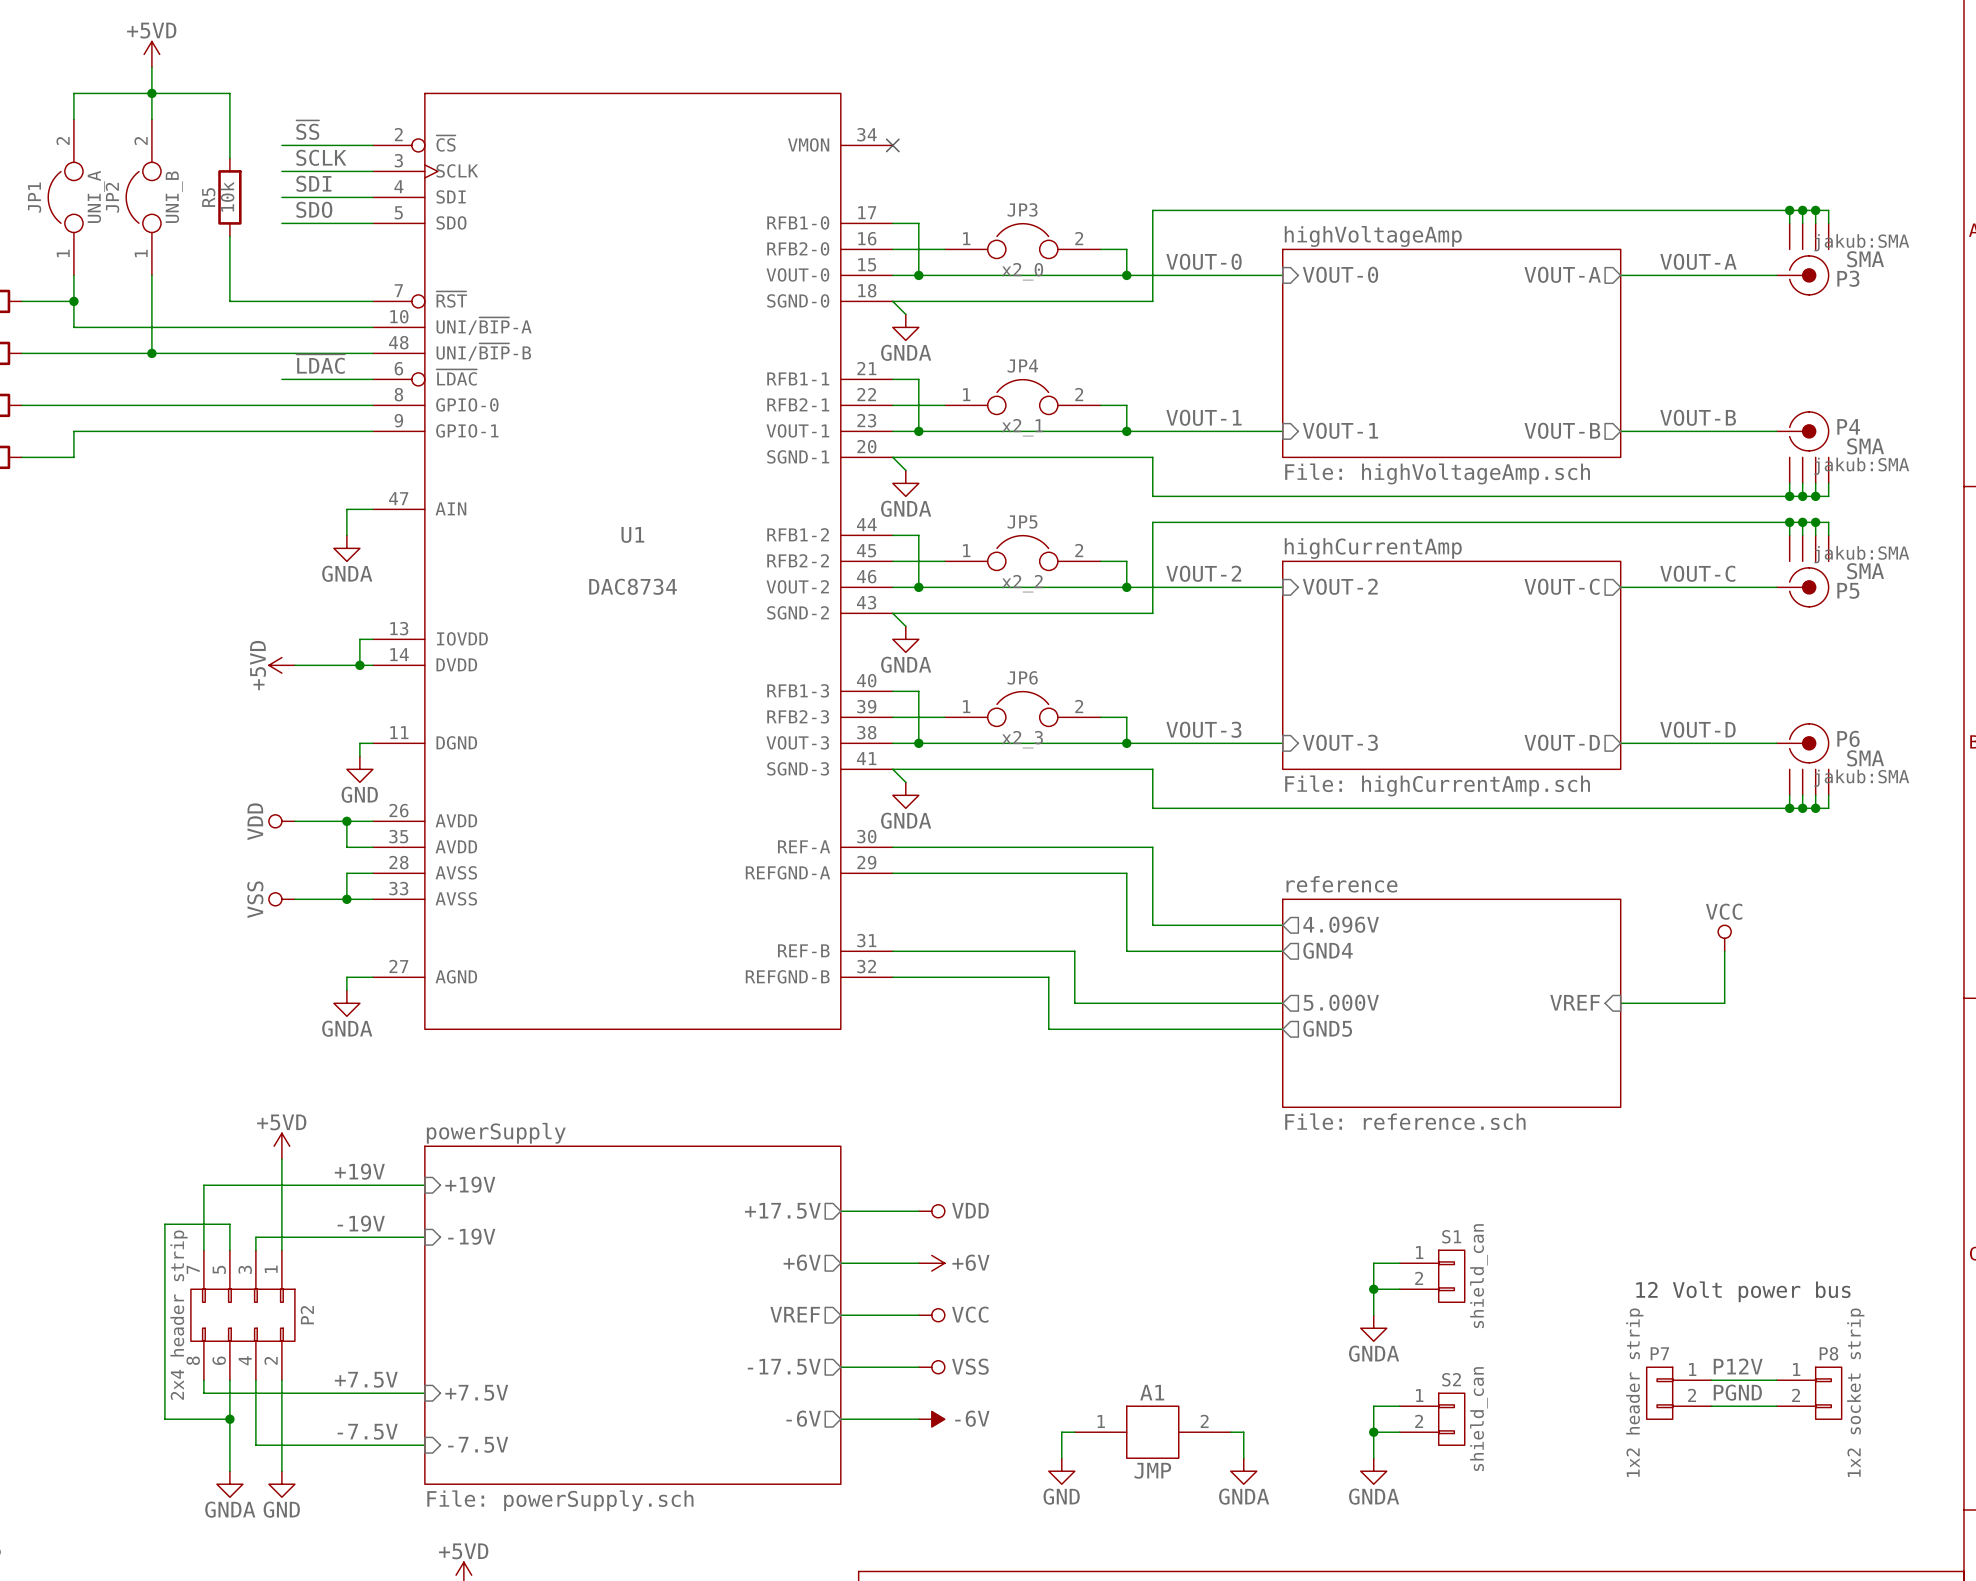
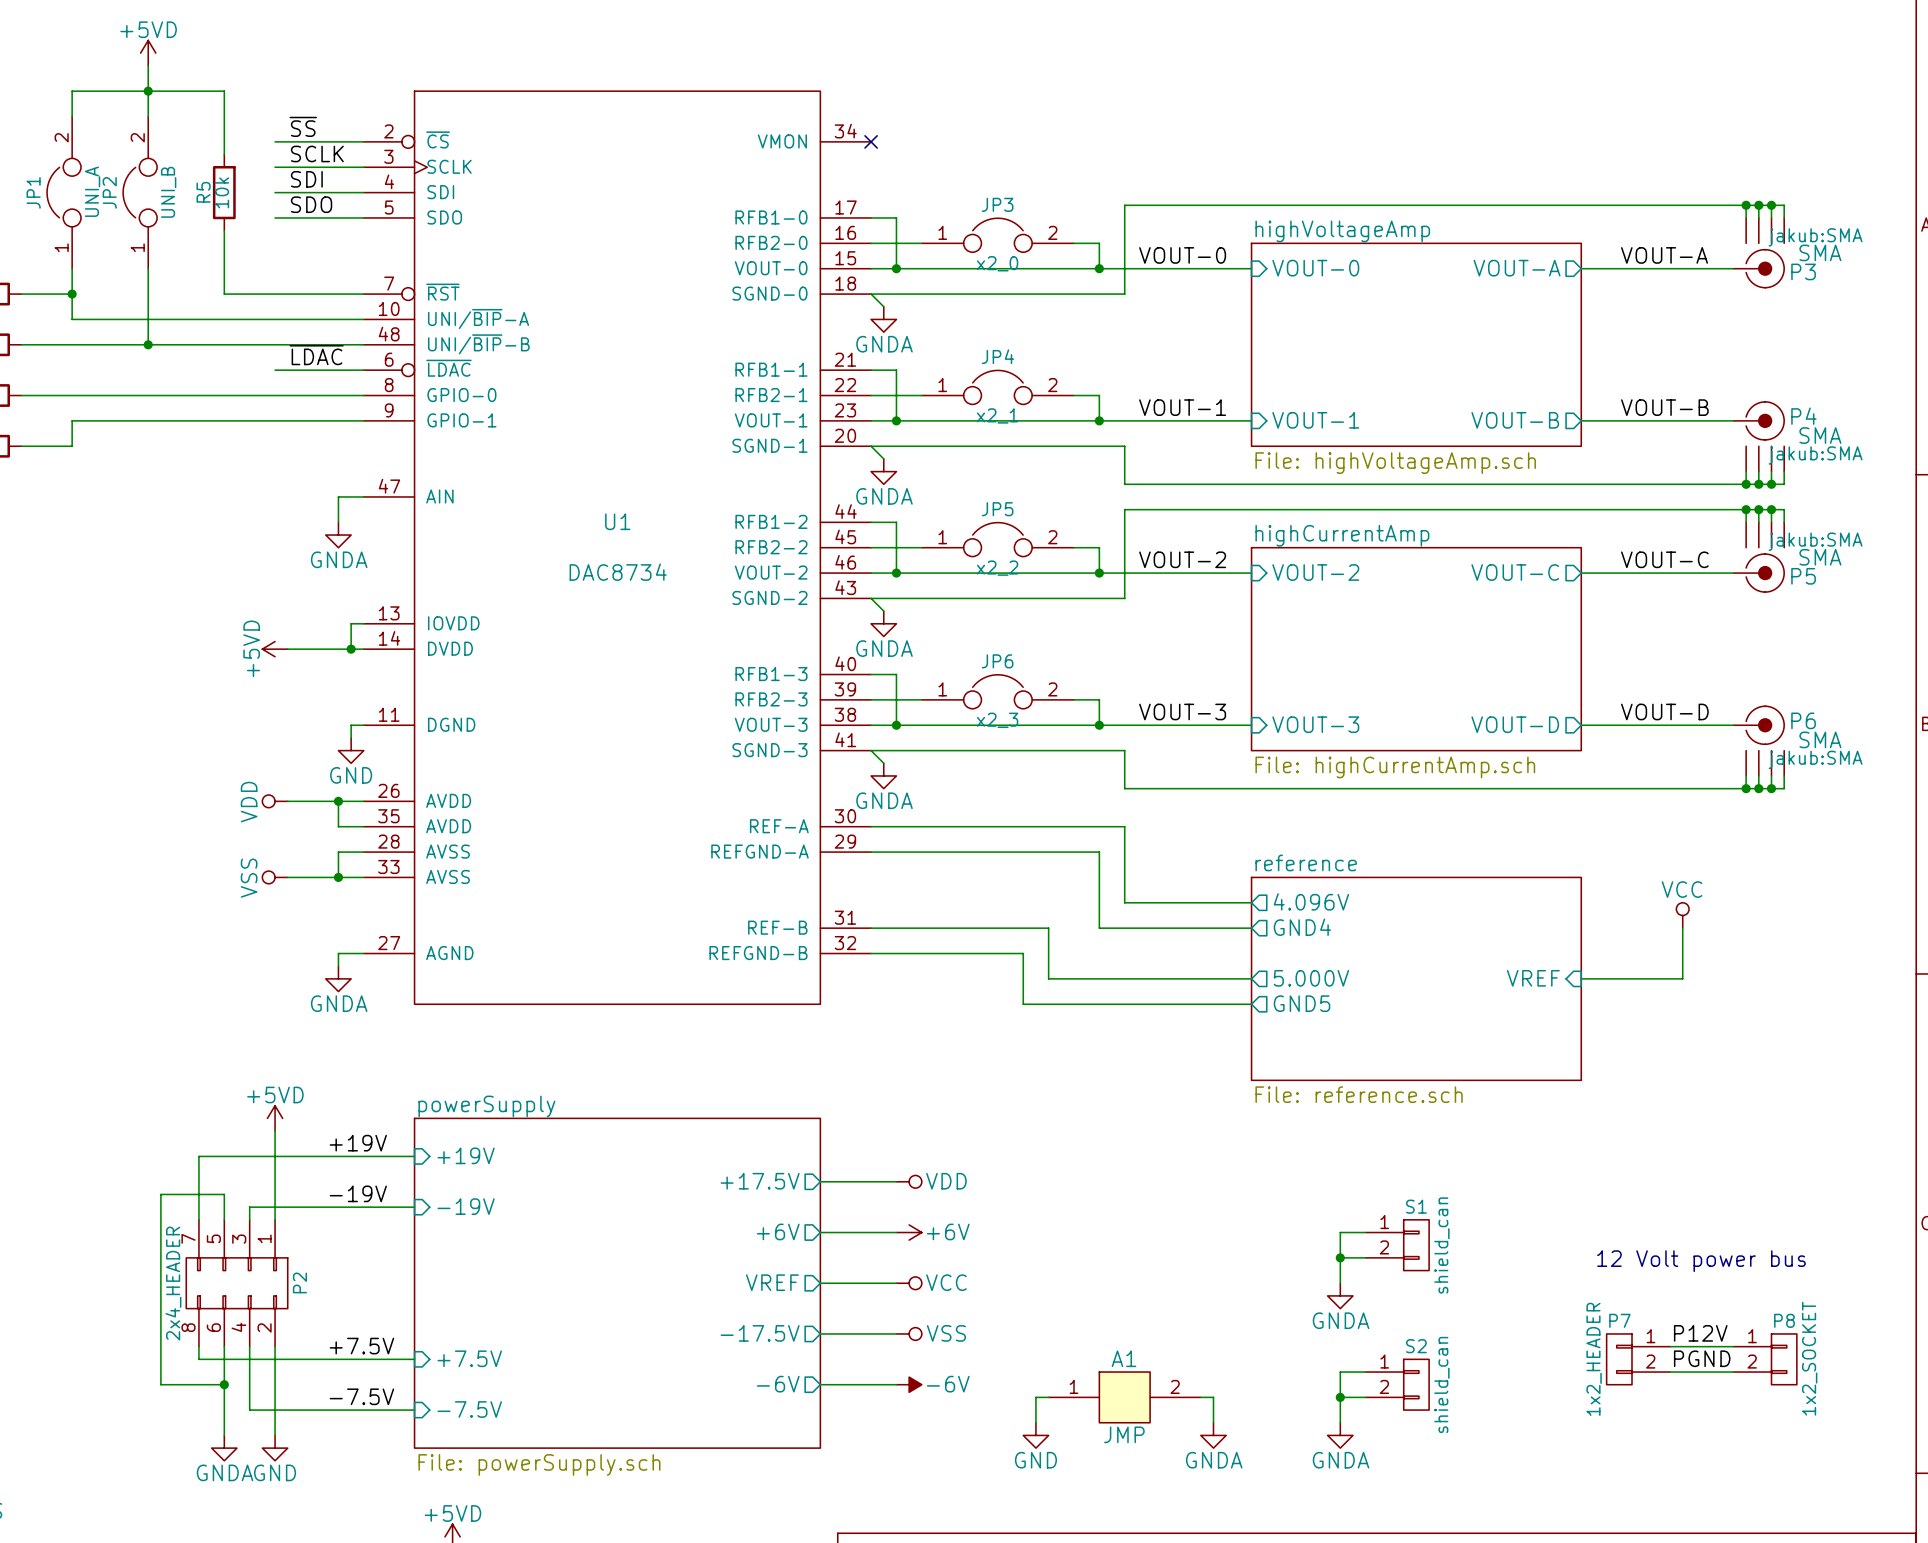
P2 value: 2x4 header strip (179, 1315) -> 2x4_HEADER (173, 1283)
P7 value: 1x2 header strip (1634, 1392) -> 1x2_HEADER (1594, 1359)
P8 value: 1x2 socket strip (1855, 1392) -> 1x2_SOCKET (1809, 1358)

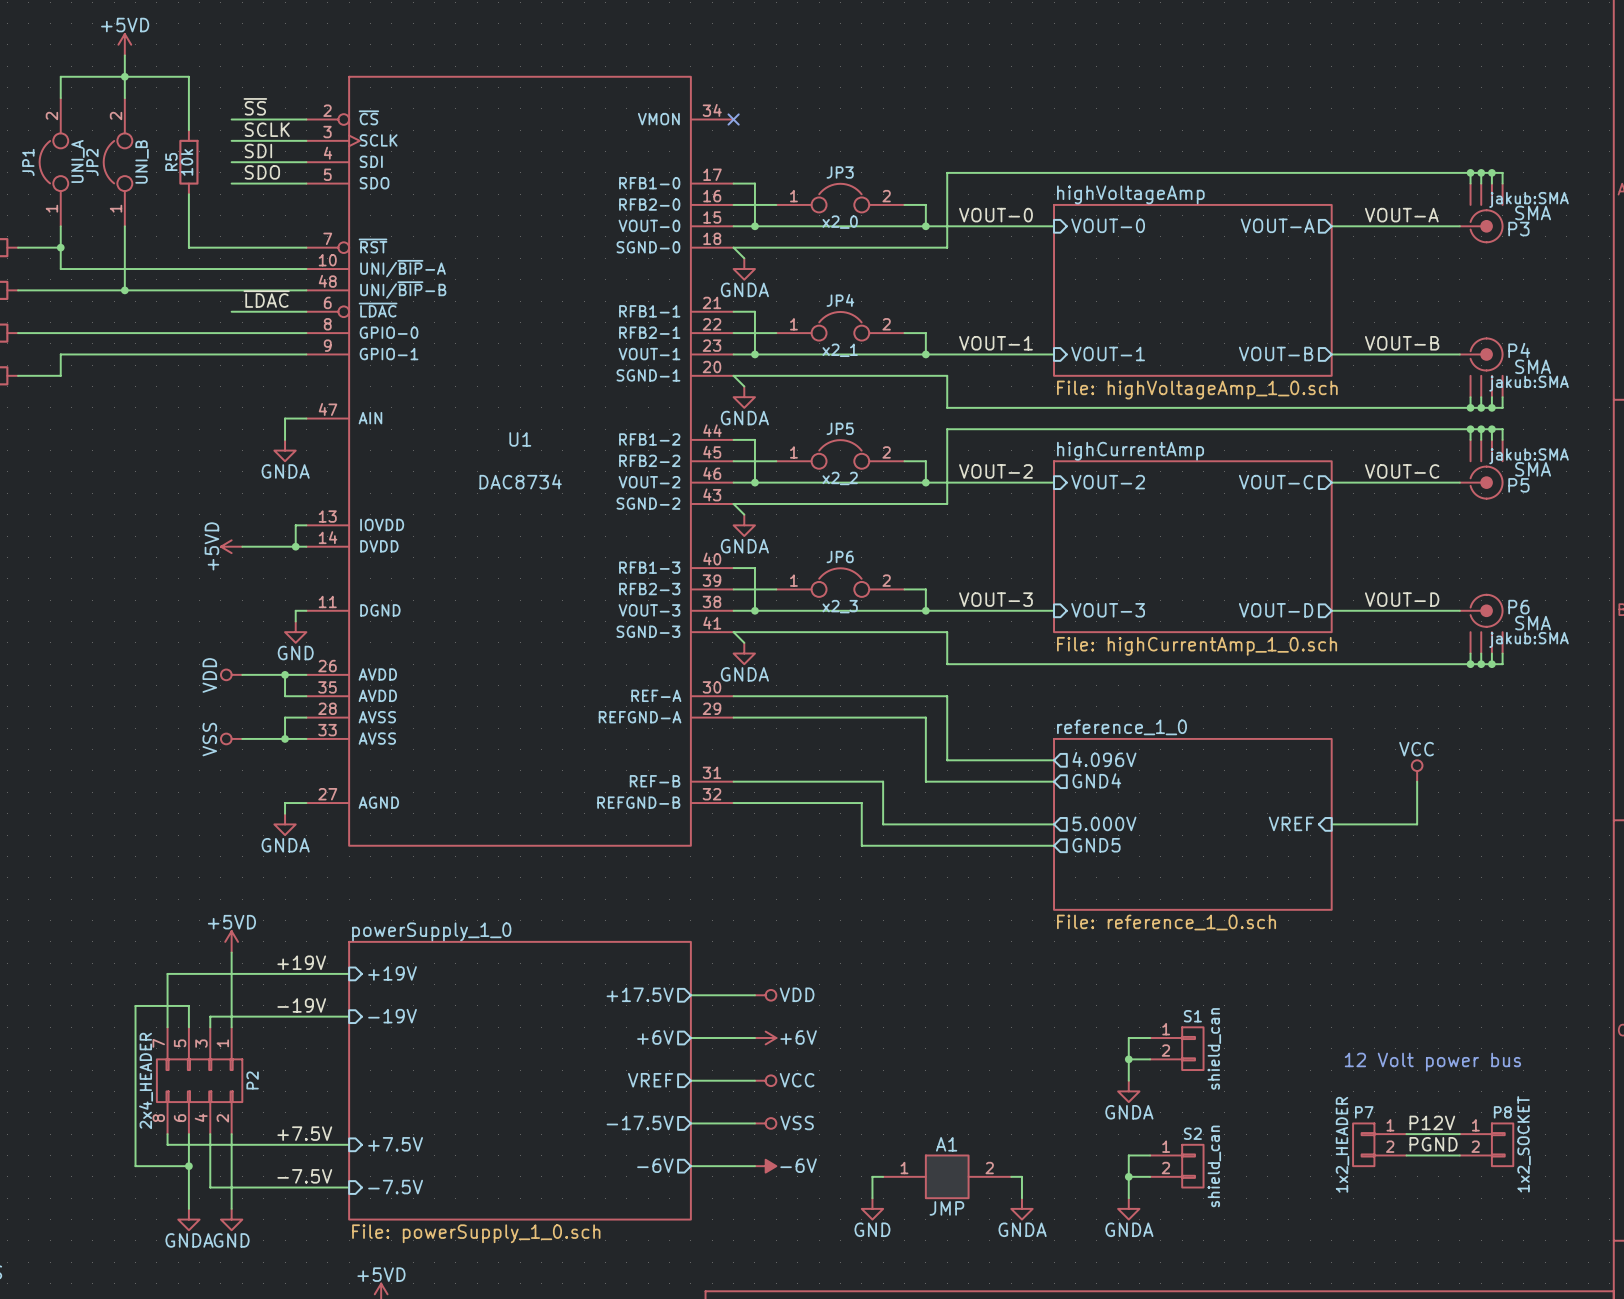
sheet highVoltageAmp value: File: highVoltageAmp.sch (1395, 463) -> File: highVoltageAmp_1_0.sch (1197, 390)
sheet highCurrentAmp value: File: highCurrentAmp.sch (1395, 767) -> File: highCurrentAmp_1_0.sch (1197, 646)
sheet reference name: reference (1306, 862) -> reference_1_0 (1121, 727)
sheet reference value: File: reference.sch (1359, 1094) -> File: reference_1_0.sch (1166, 922)
sheet powerSupply name: powerSupply (486, 1106) -> powerSupply_1_0 (431, 931)
sheet powerSupply value: File: powerSupply.sch (539, 1464) -> File: powerSupply_1_0.sch (476, 1233)

